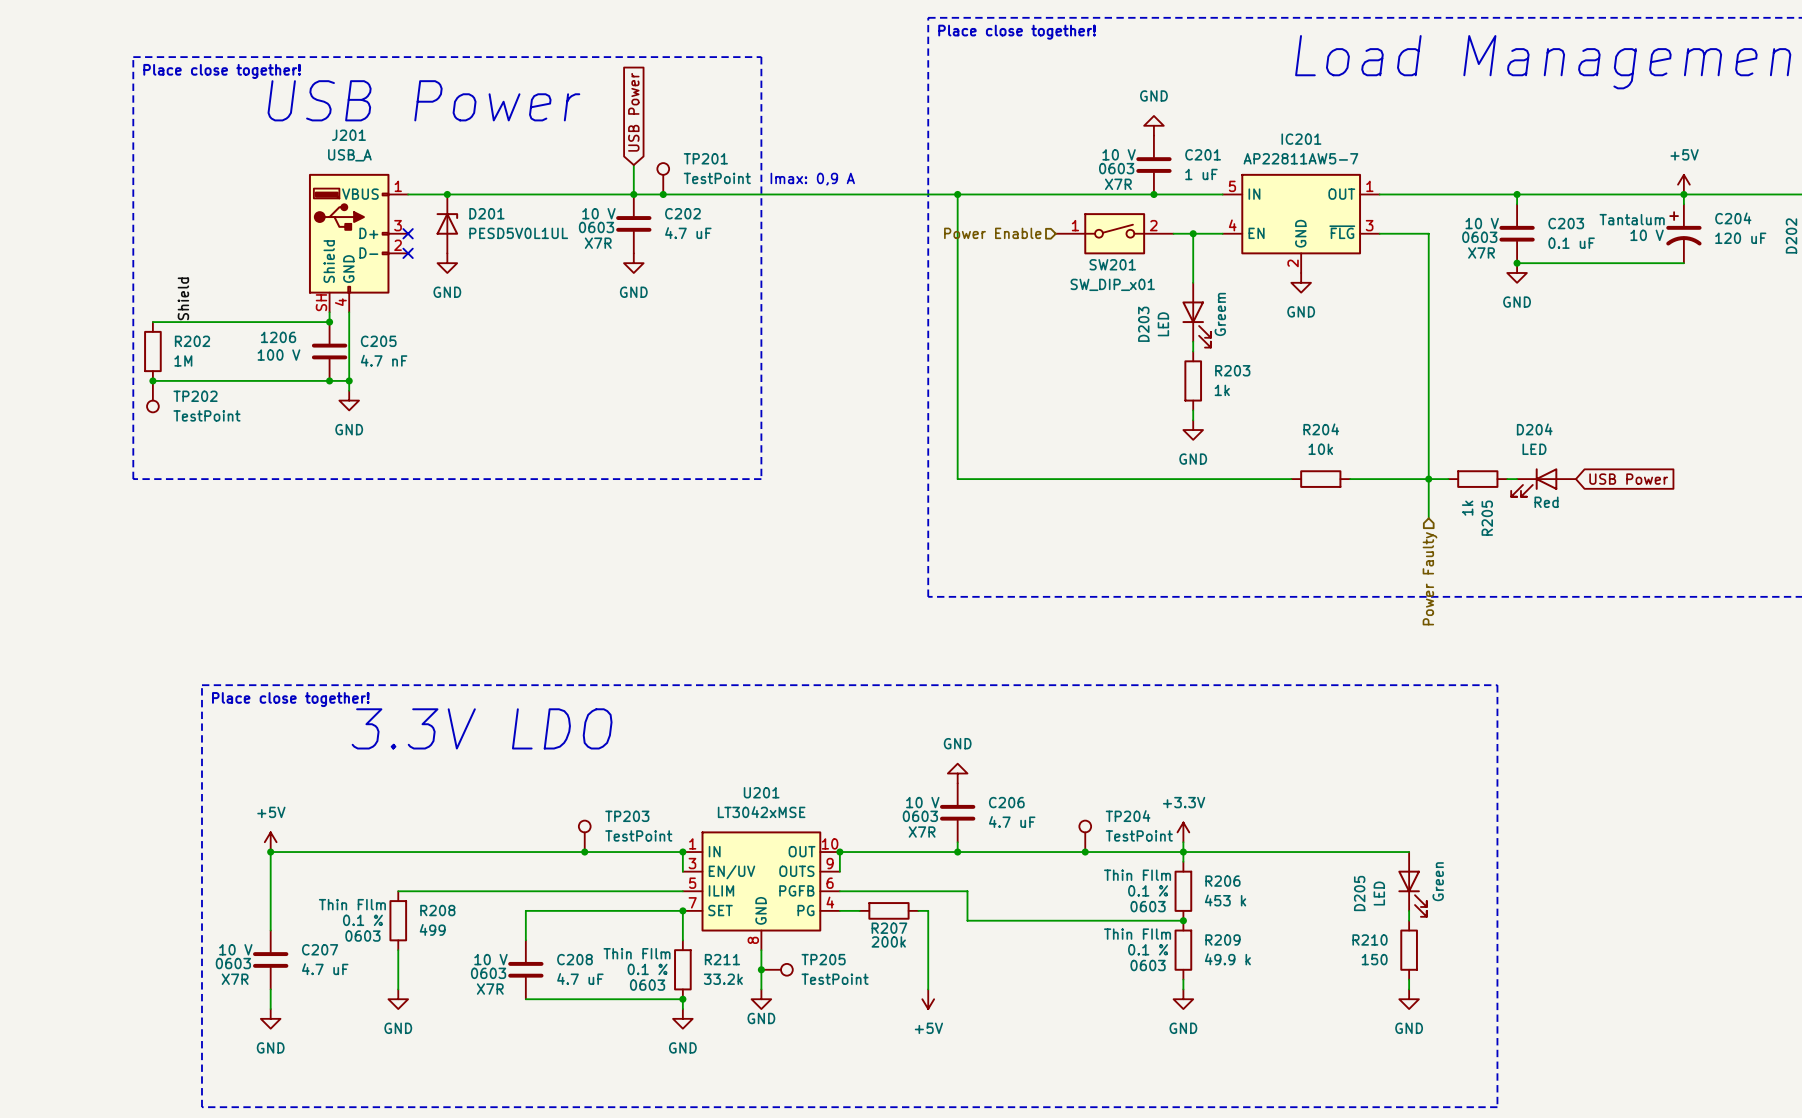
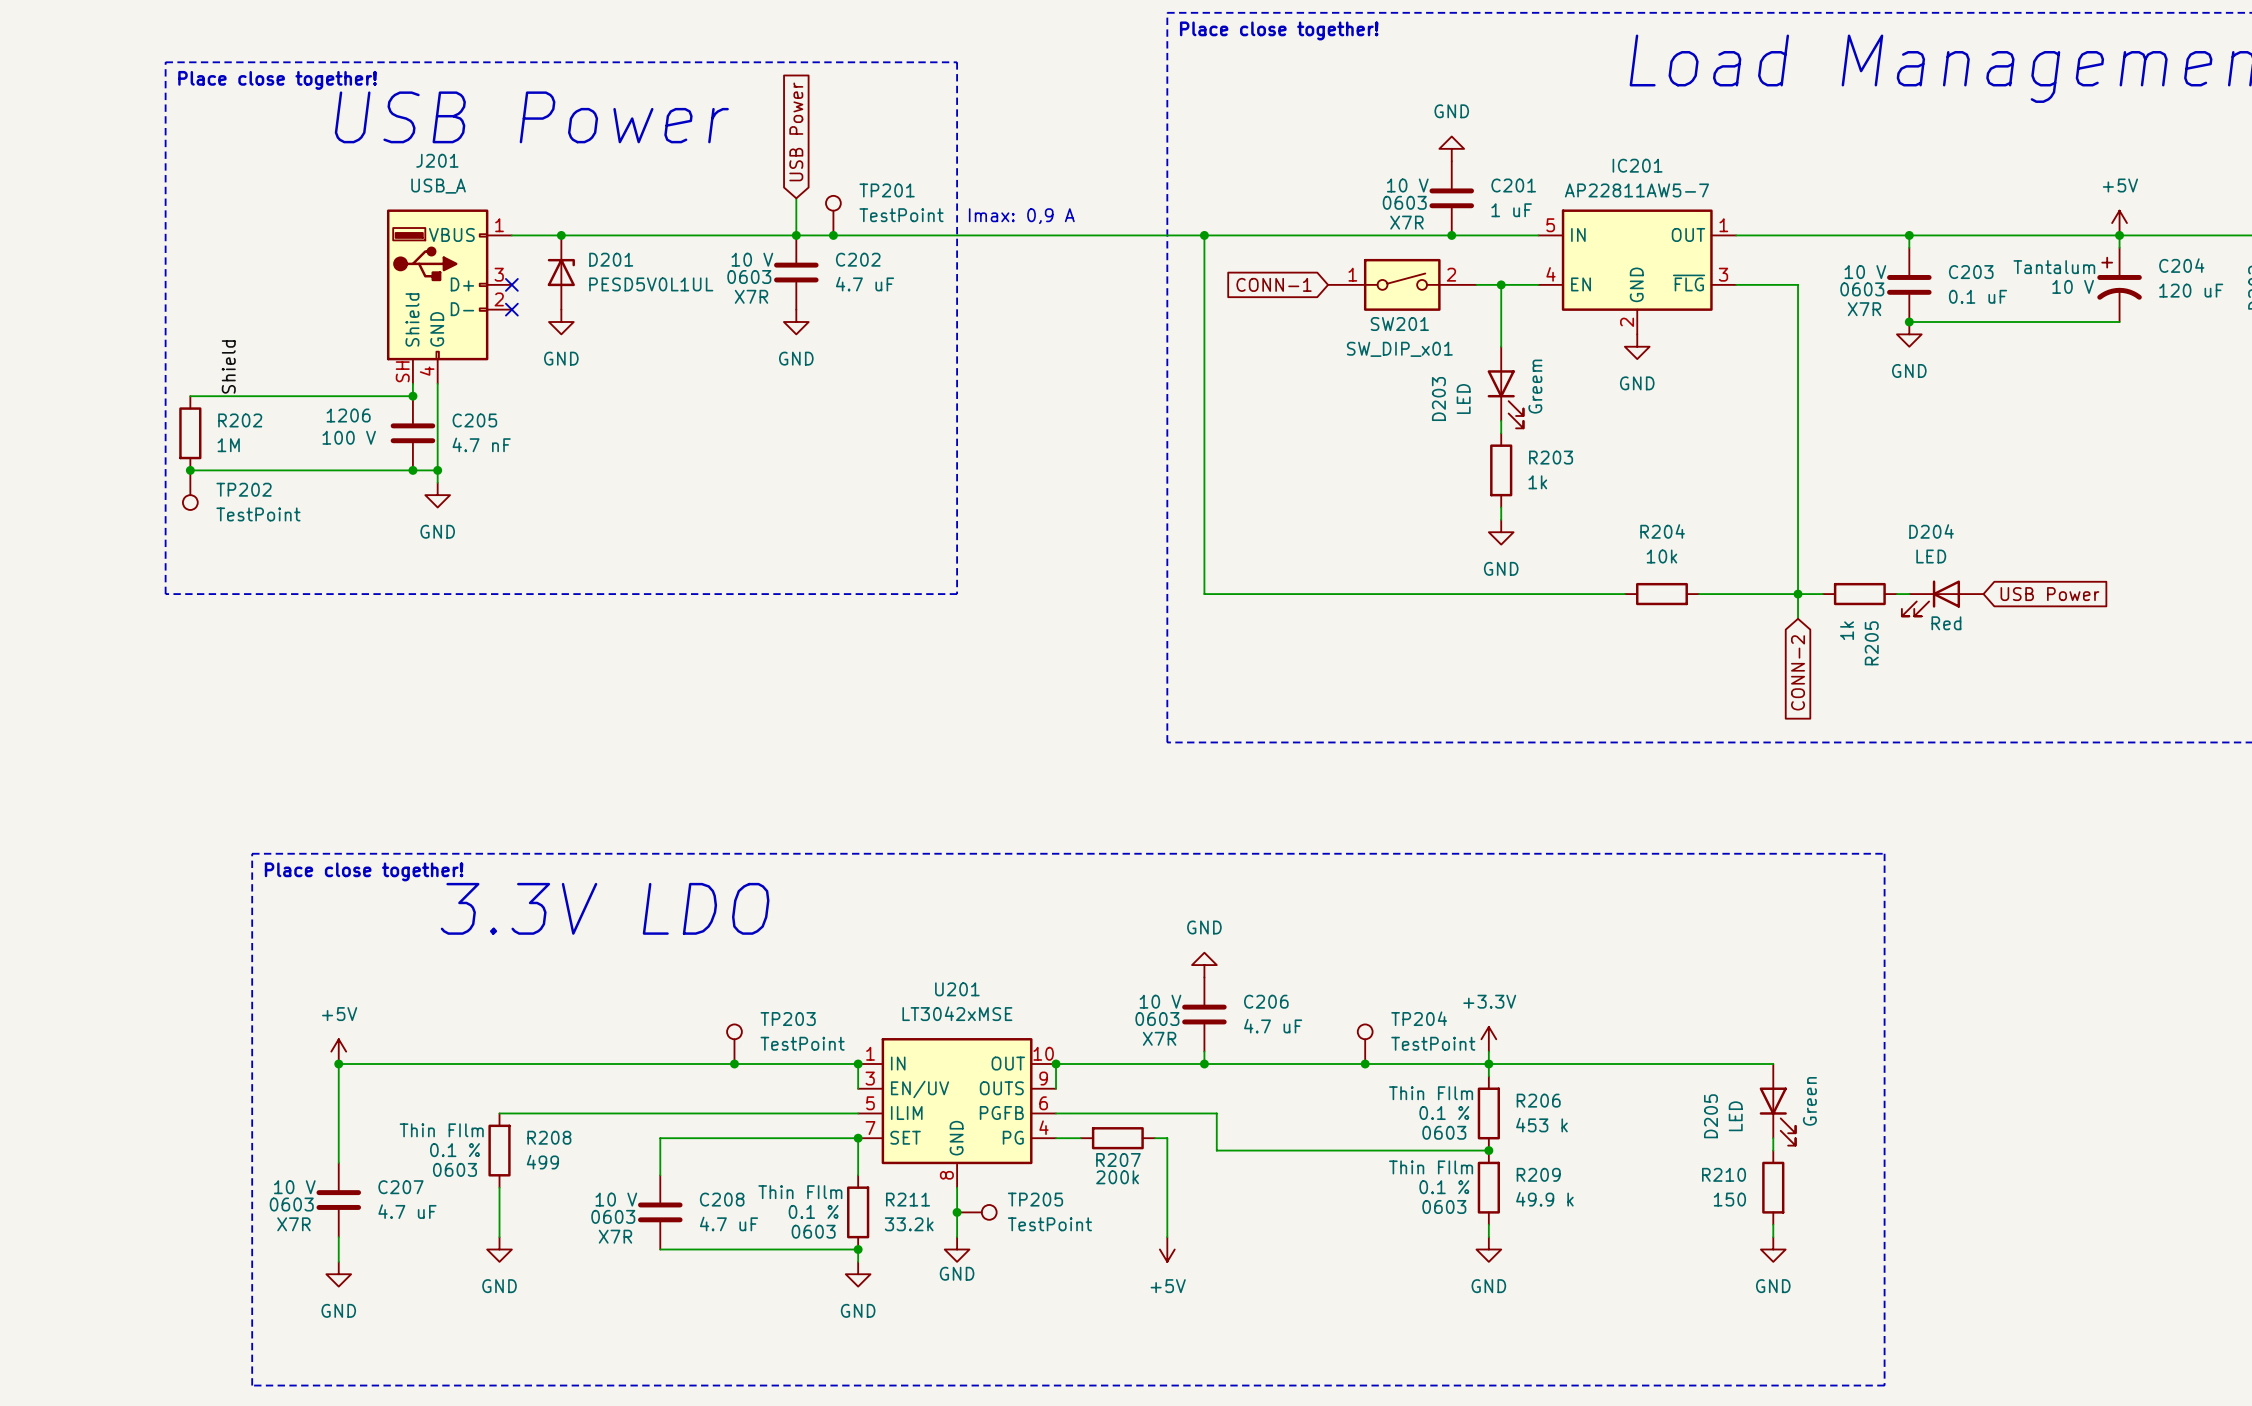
hierarchical label: Power Enable (992, 233) -> none
global label: none -> CONN-1 (1274, 284)
wire: (1428, 498) (1428, 518) -> none
global label: none -> CONN-2 (1798, 672)
hierarchical label: Power Faulty (1430, 578) -> none

